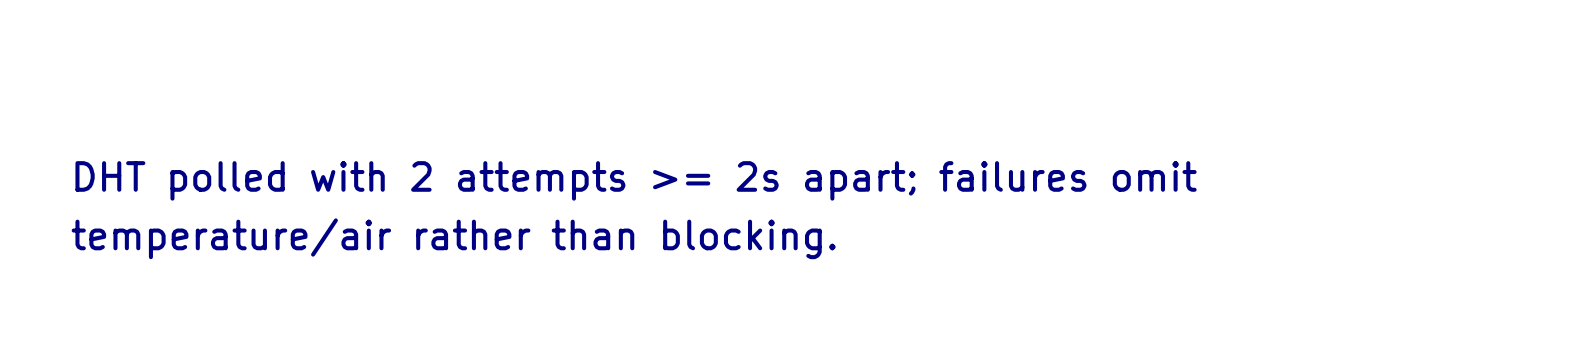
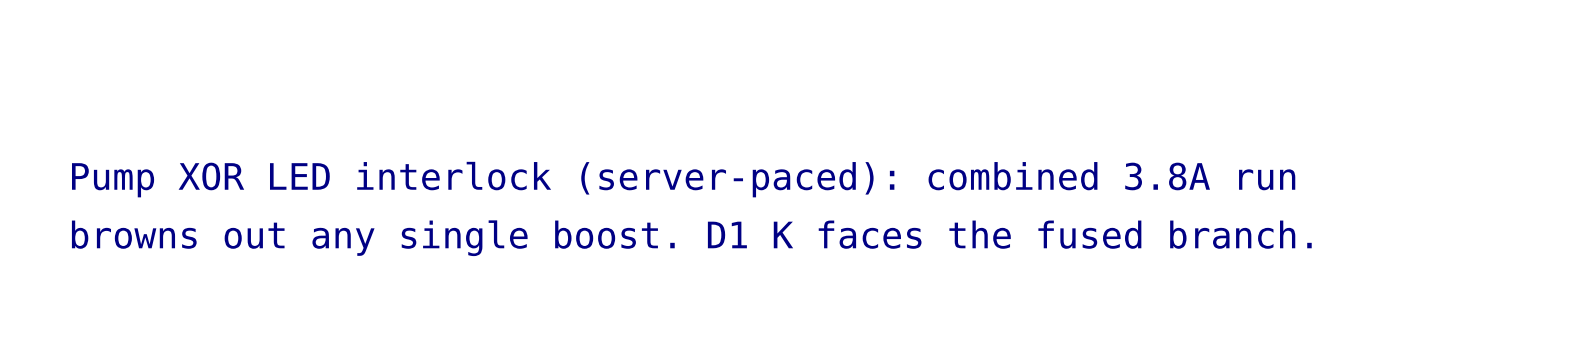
text: DHT polled with 2 attempts >= 2s apart; failures omit (636, 180) -> Pump XOR LED interlock (server-paced): combined 3.8A run (683, 179)
text: temperature/air rather than blocking. (453, 238) -> browns out any single boost. D1 K faces the fused branch. (691, 238)

